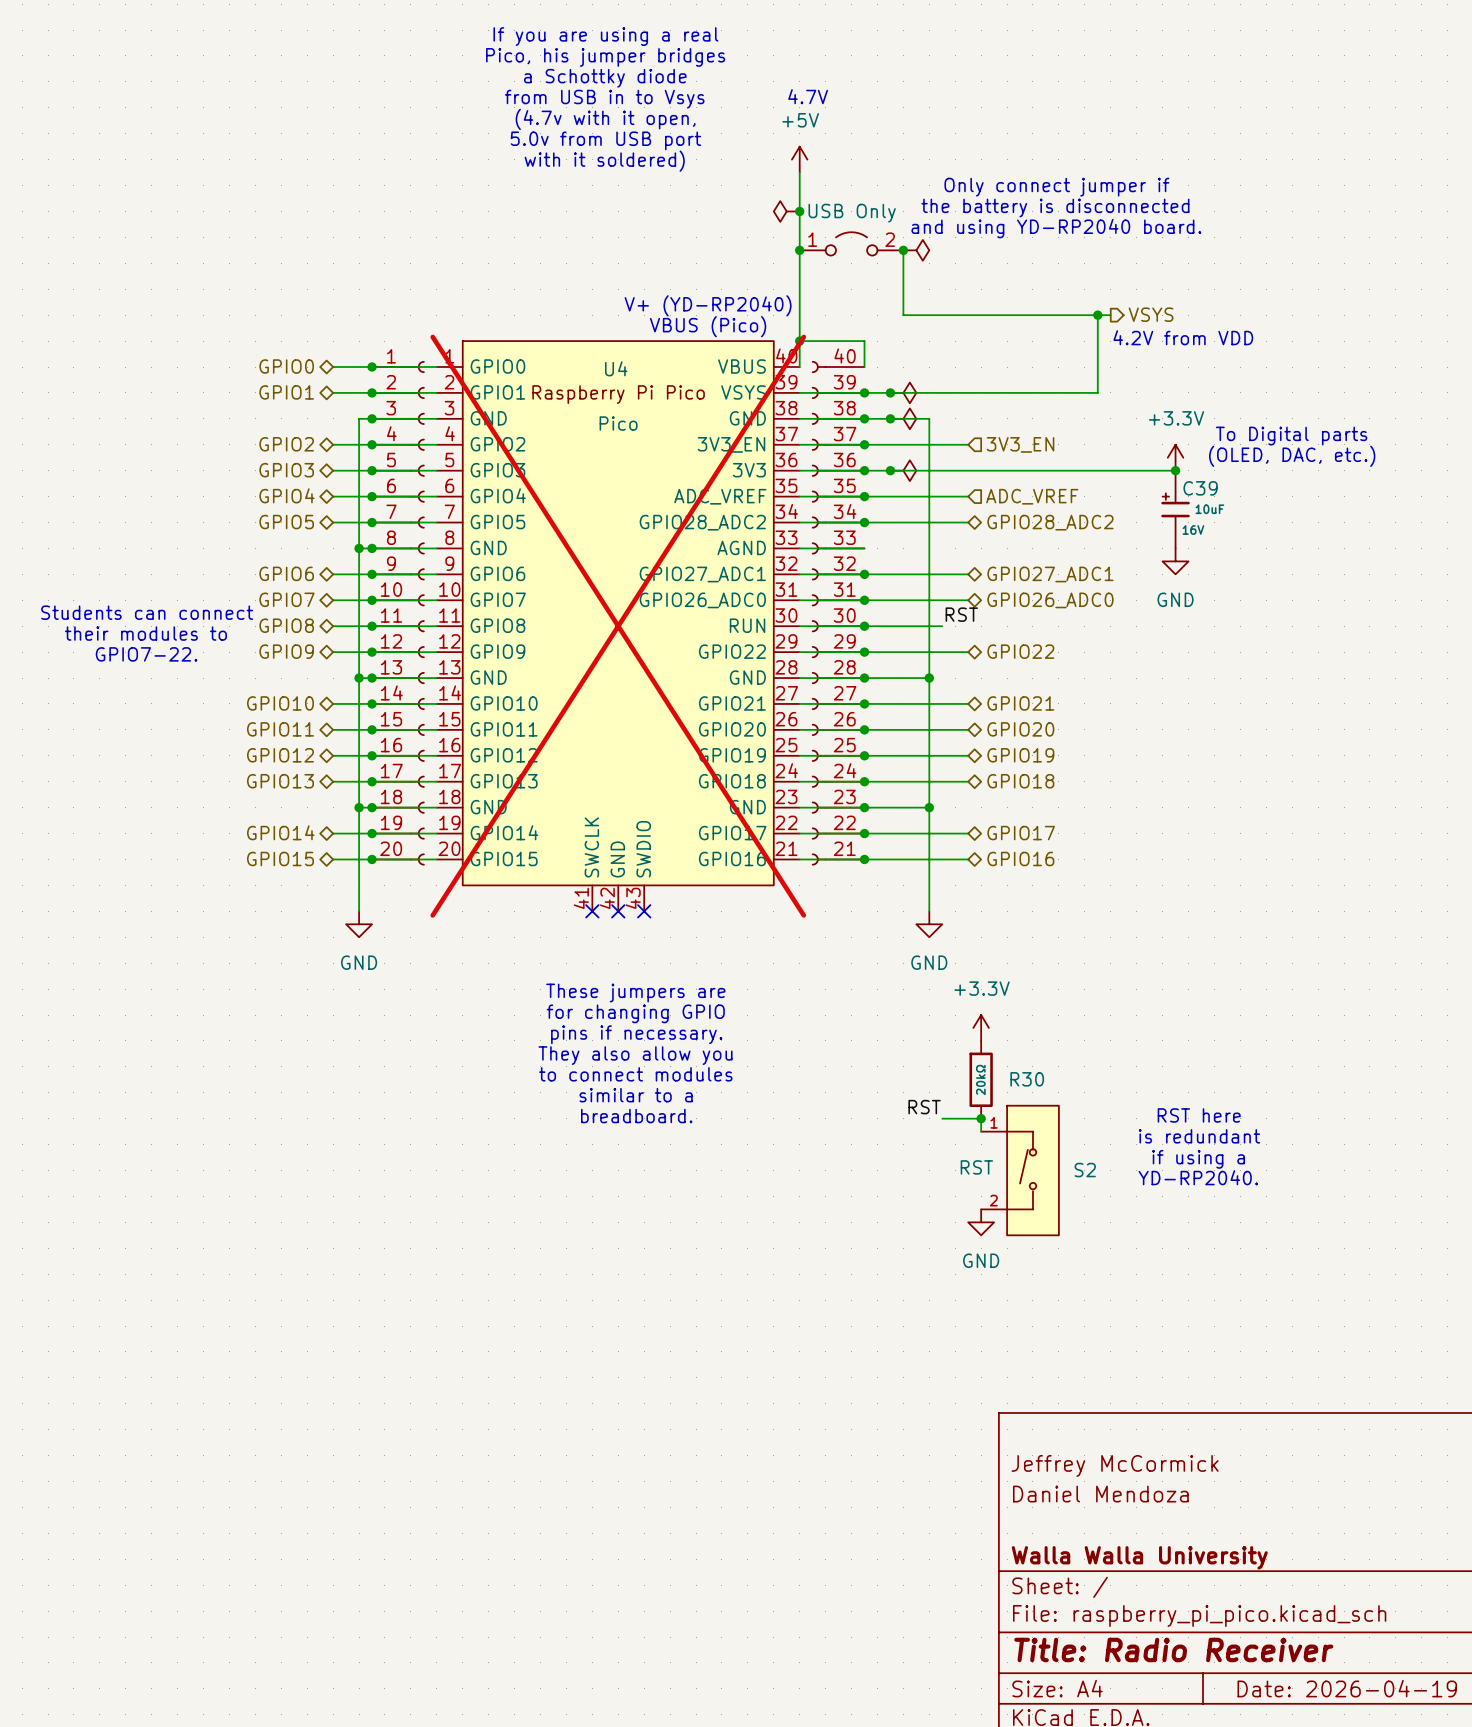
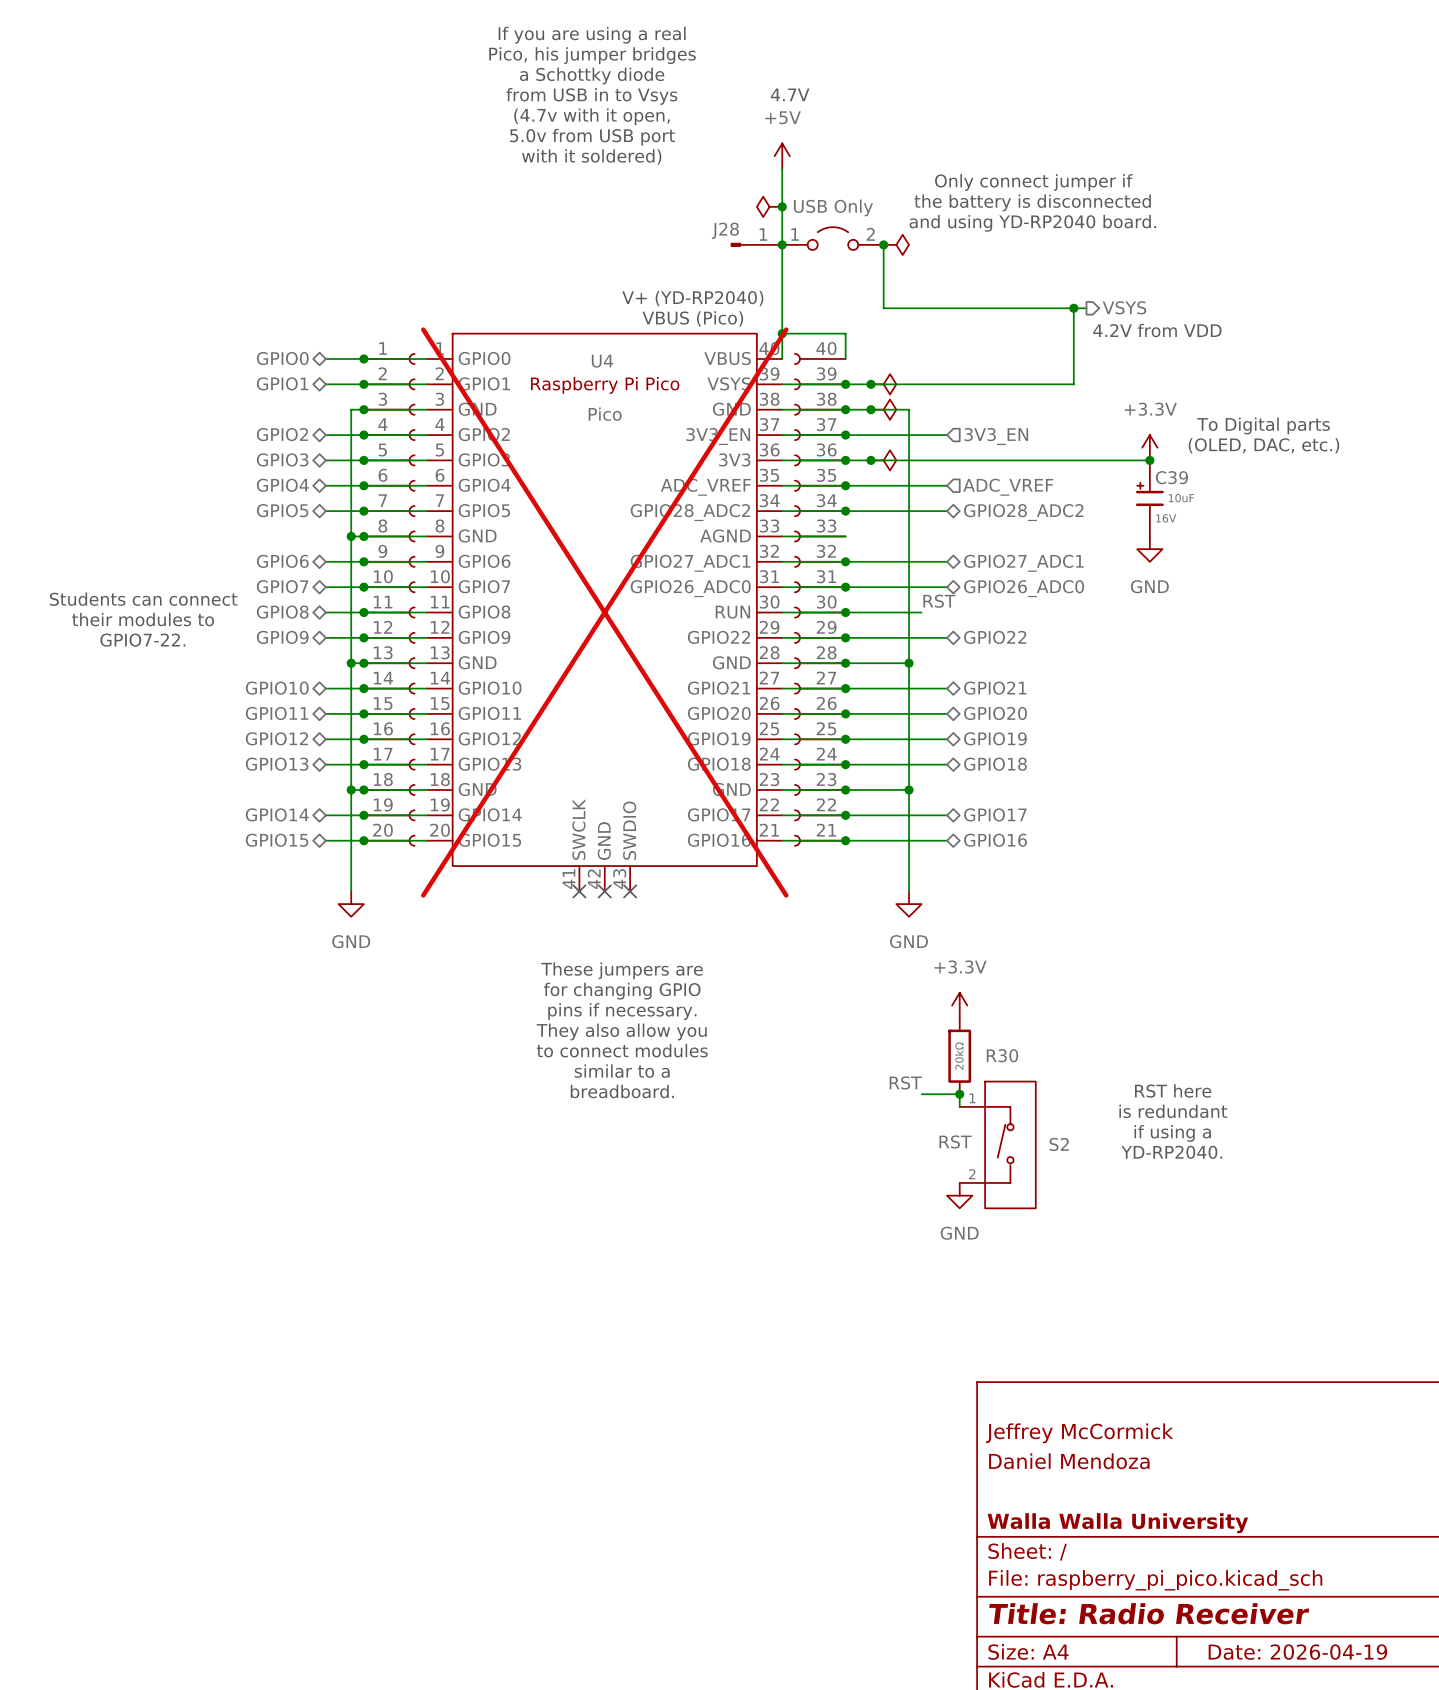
J28: none -> (756, 244)

